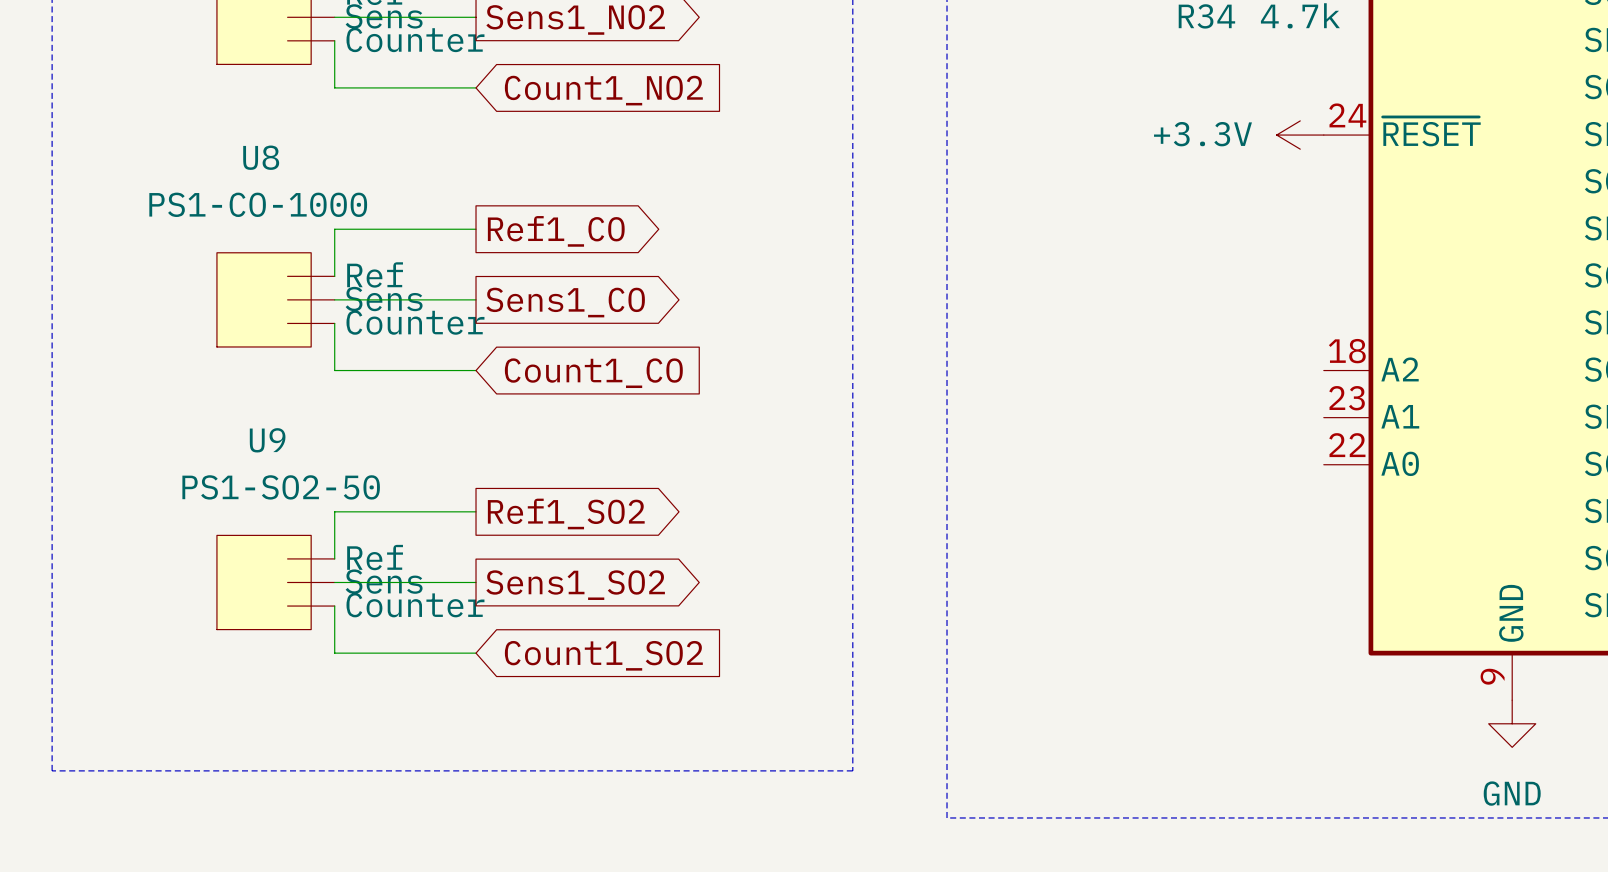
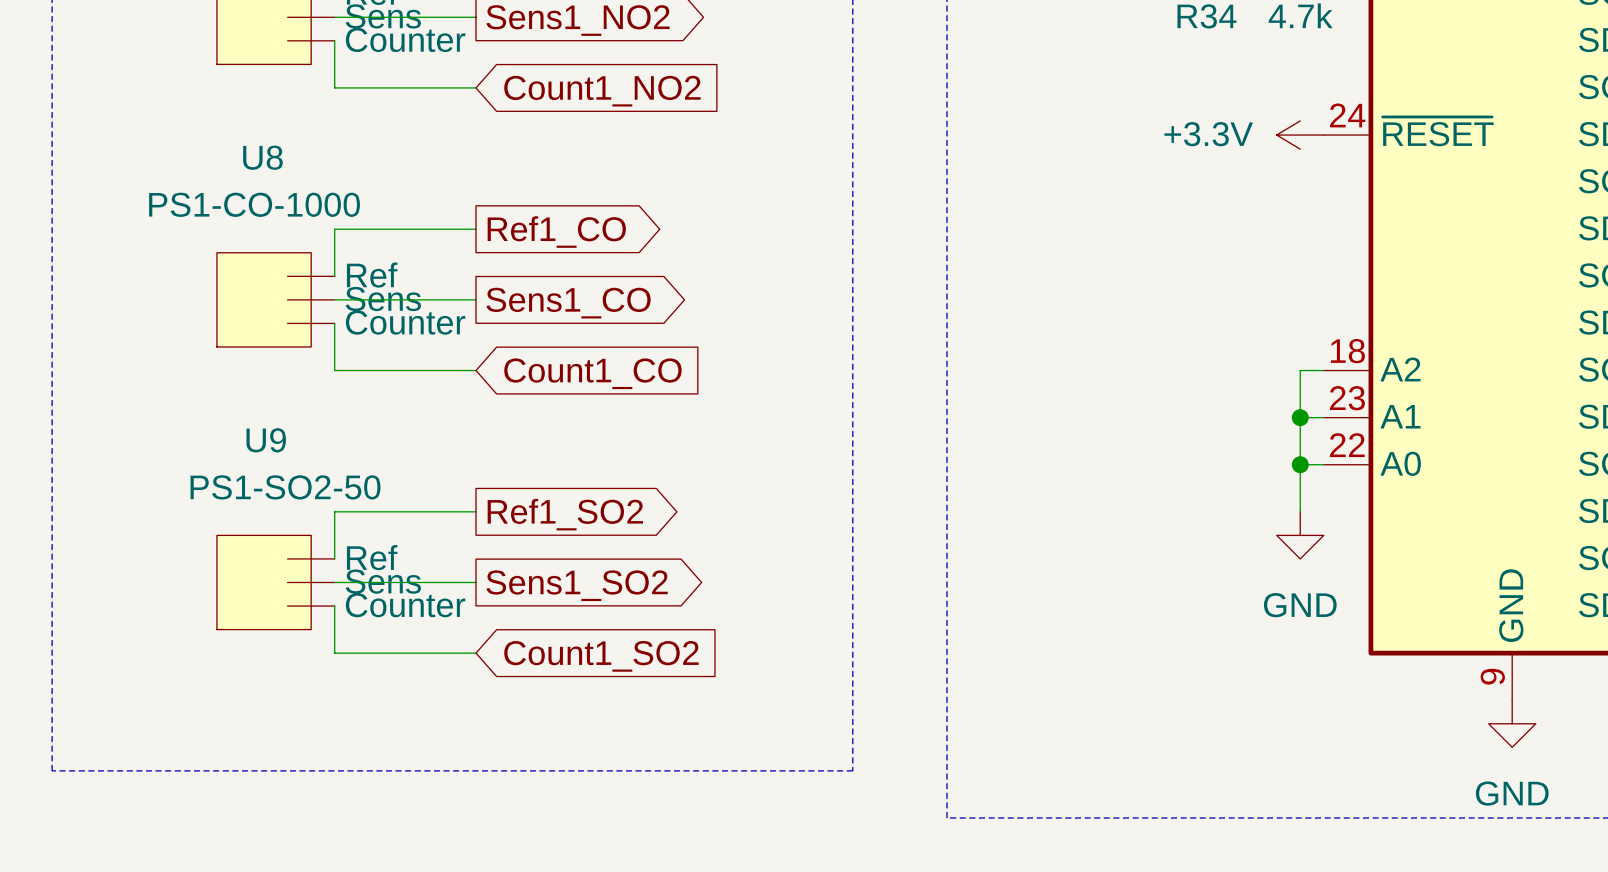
wire: none -> (1323, 370) (1300, 370) (1300, 511)
wire: none -> (1300, 417) (1323, 417)
junction: none -> (1300, 417)
wire: none -> (1300, 464) (1323, 464)
junction: none -> (1300, 464)
power symbol: none -> GND (1300, 535)

